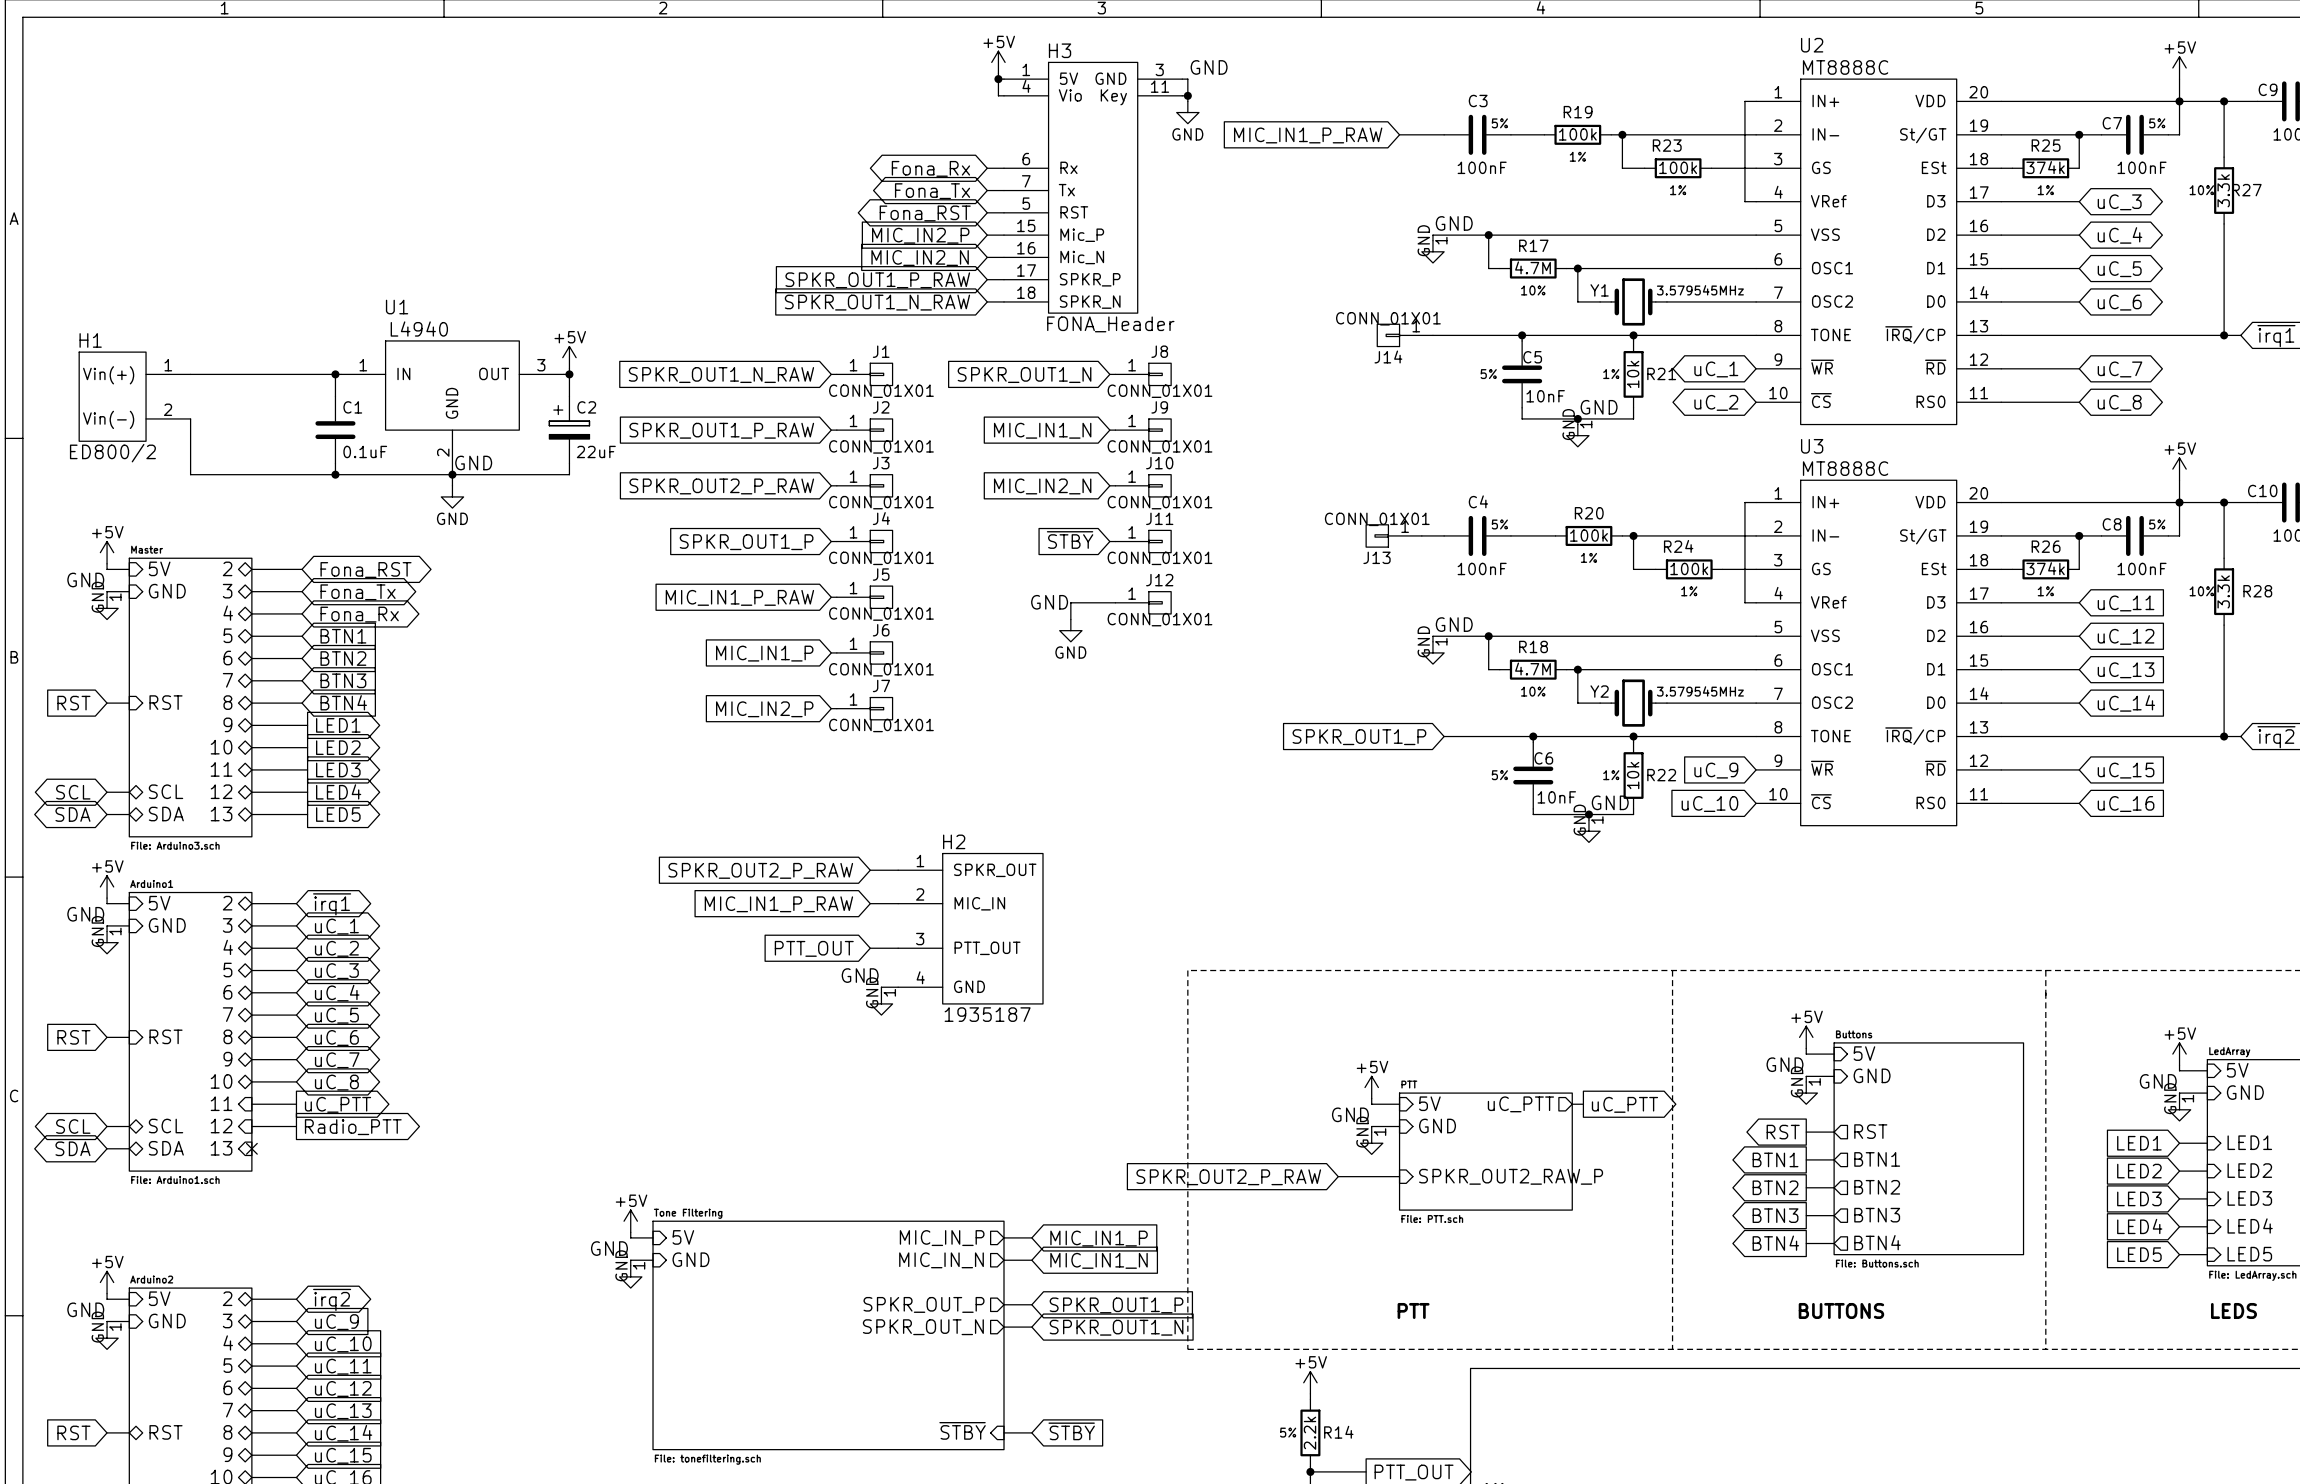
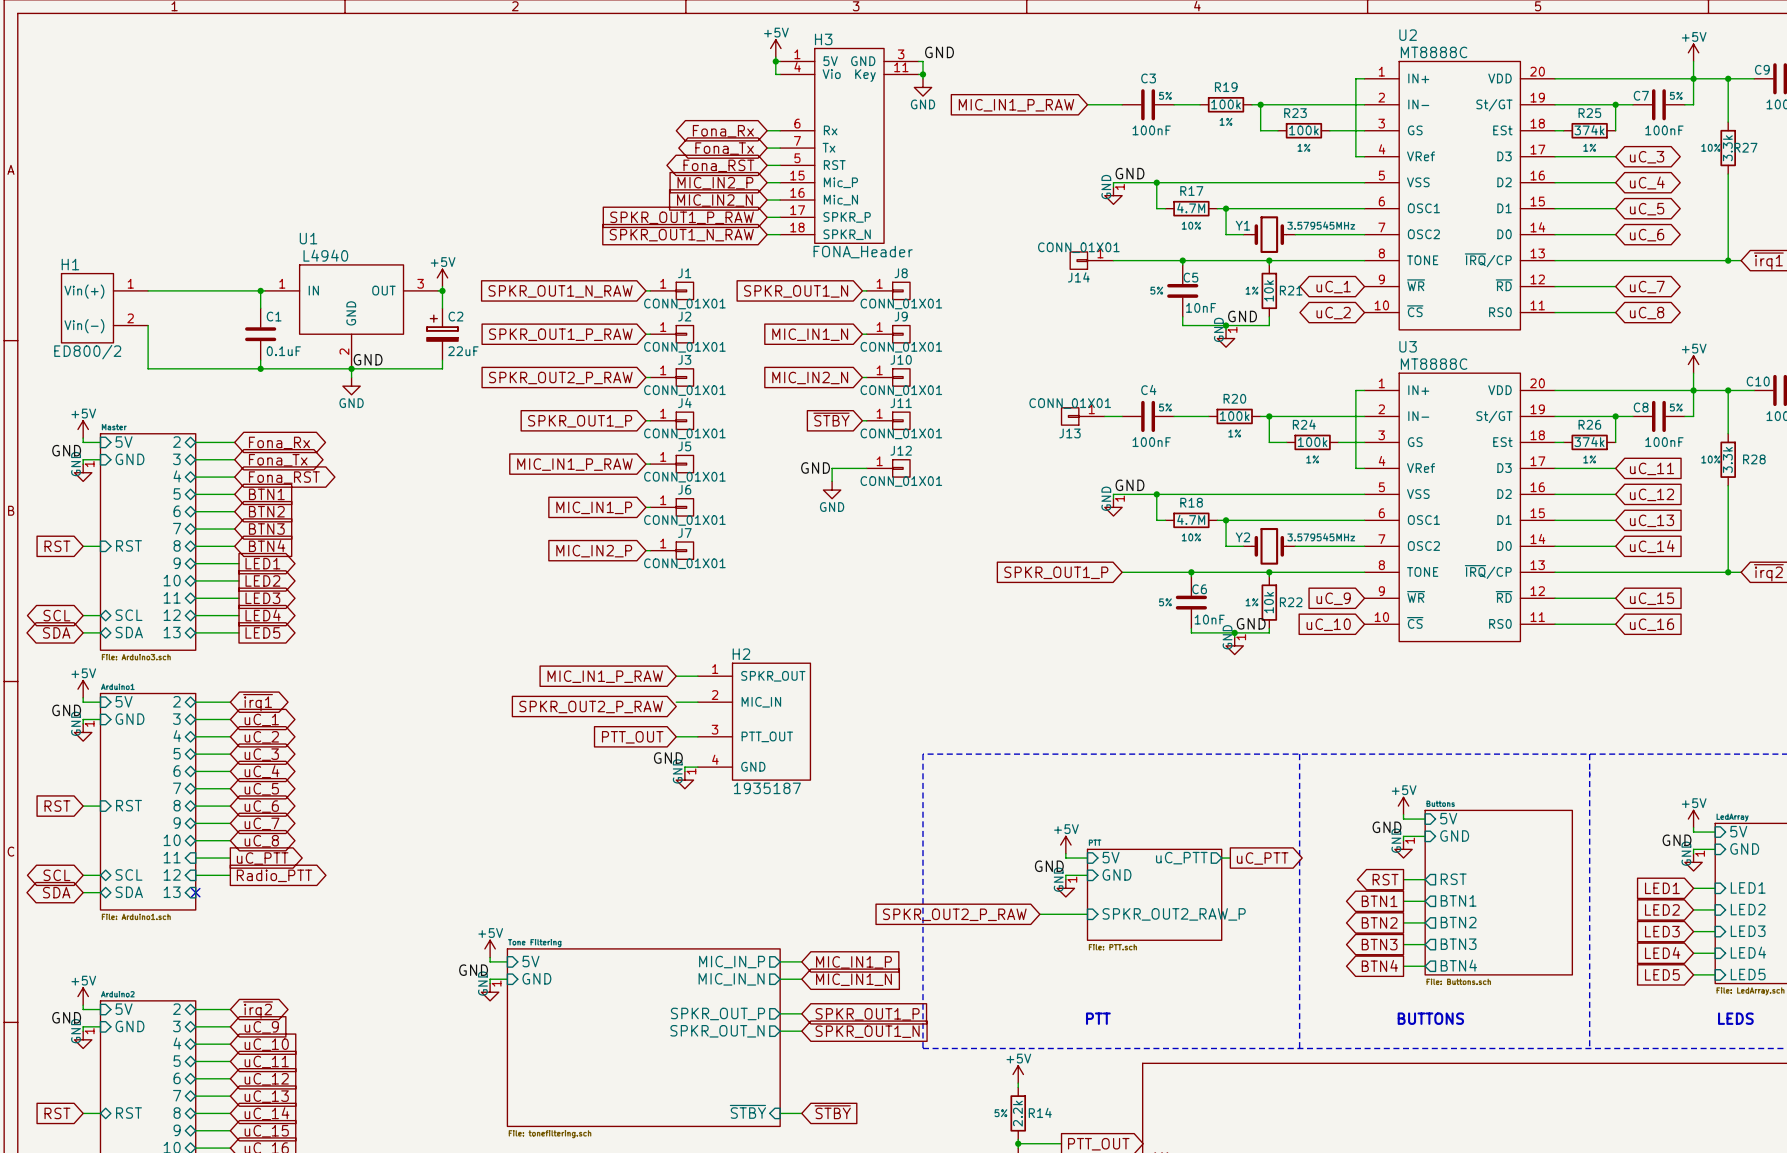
global label: Fona_RST (366, 570) -> Fona_Rx (279, 442)
global label: Fona_Rx (359, 614) -> Fona_RST (284, 477)
global label: SPKR_OUT2_P_RAW (760, 870) -> MIC_IN1_P_RAW (605, 676)
global label: MIC_IN1_P_RAW (778, 904) -> SPKR_OUT2_P_RAW (591, 706)

